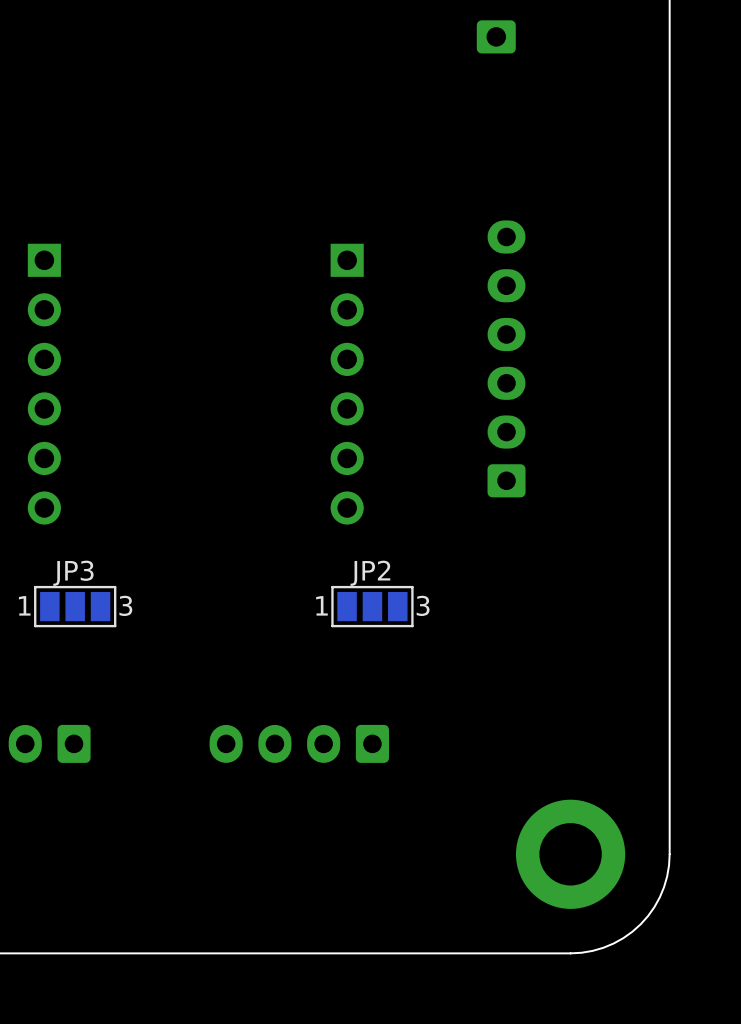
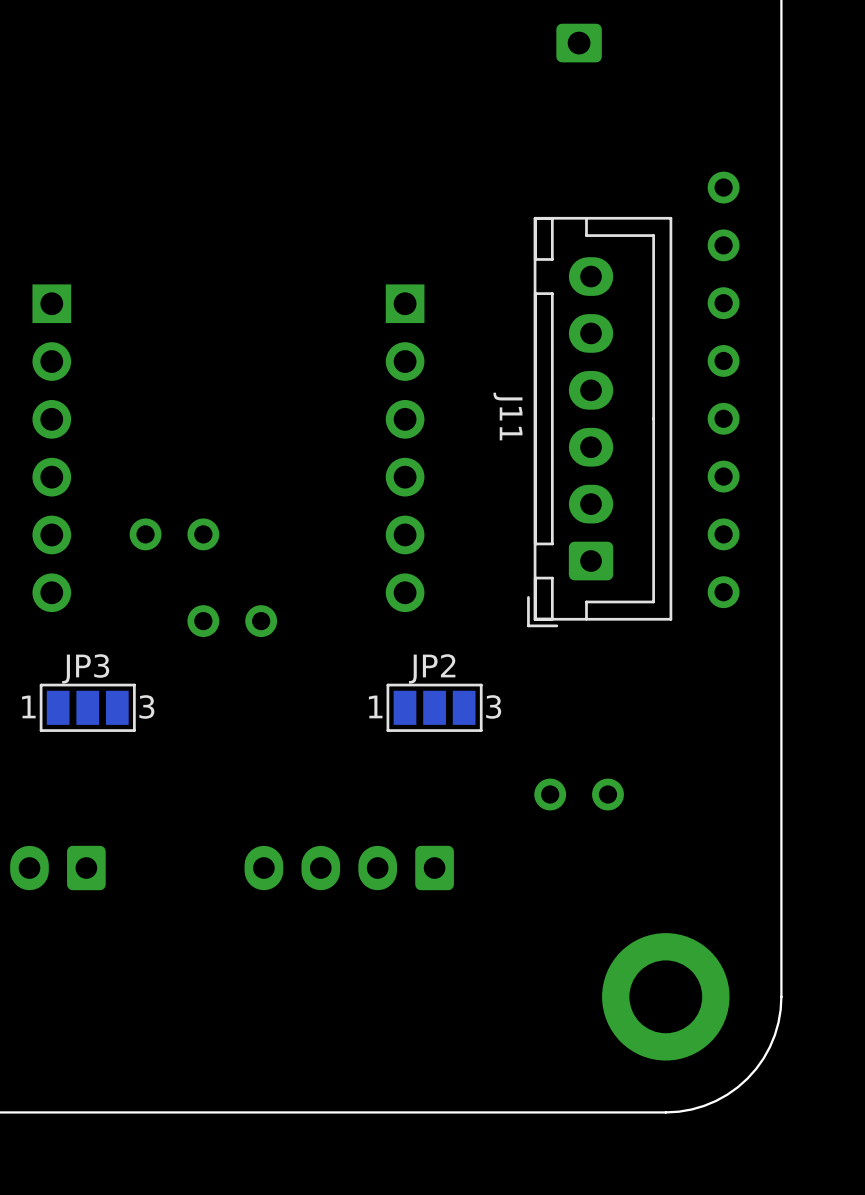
part: none -> (723, 216)
part: none -> (723, 332)
J11 side: top (506, 358) -> bottom (599, 422)
part: none -> (723, 447)
part: none -> (174, 534)
part: none -> (723, 563)
part: none -> (232, 621)
part: none -> (579, 794)

